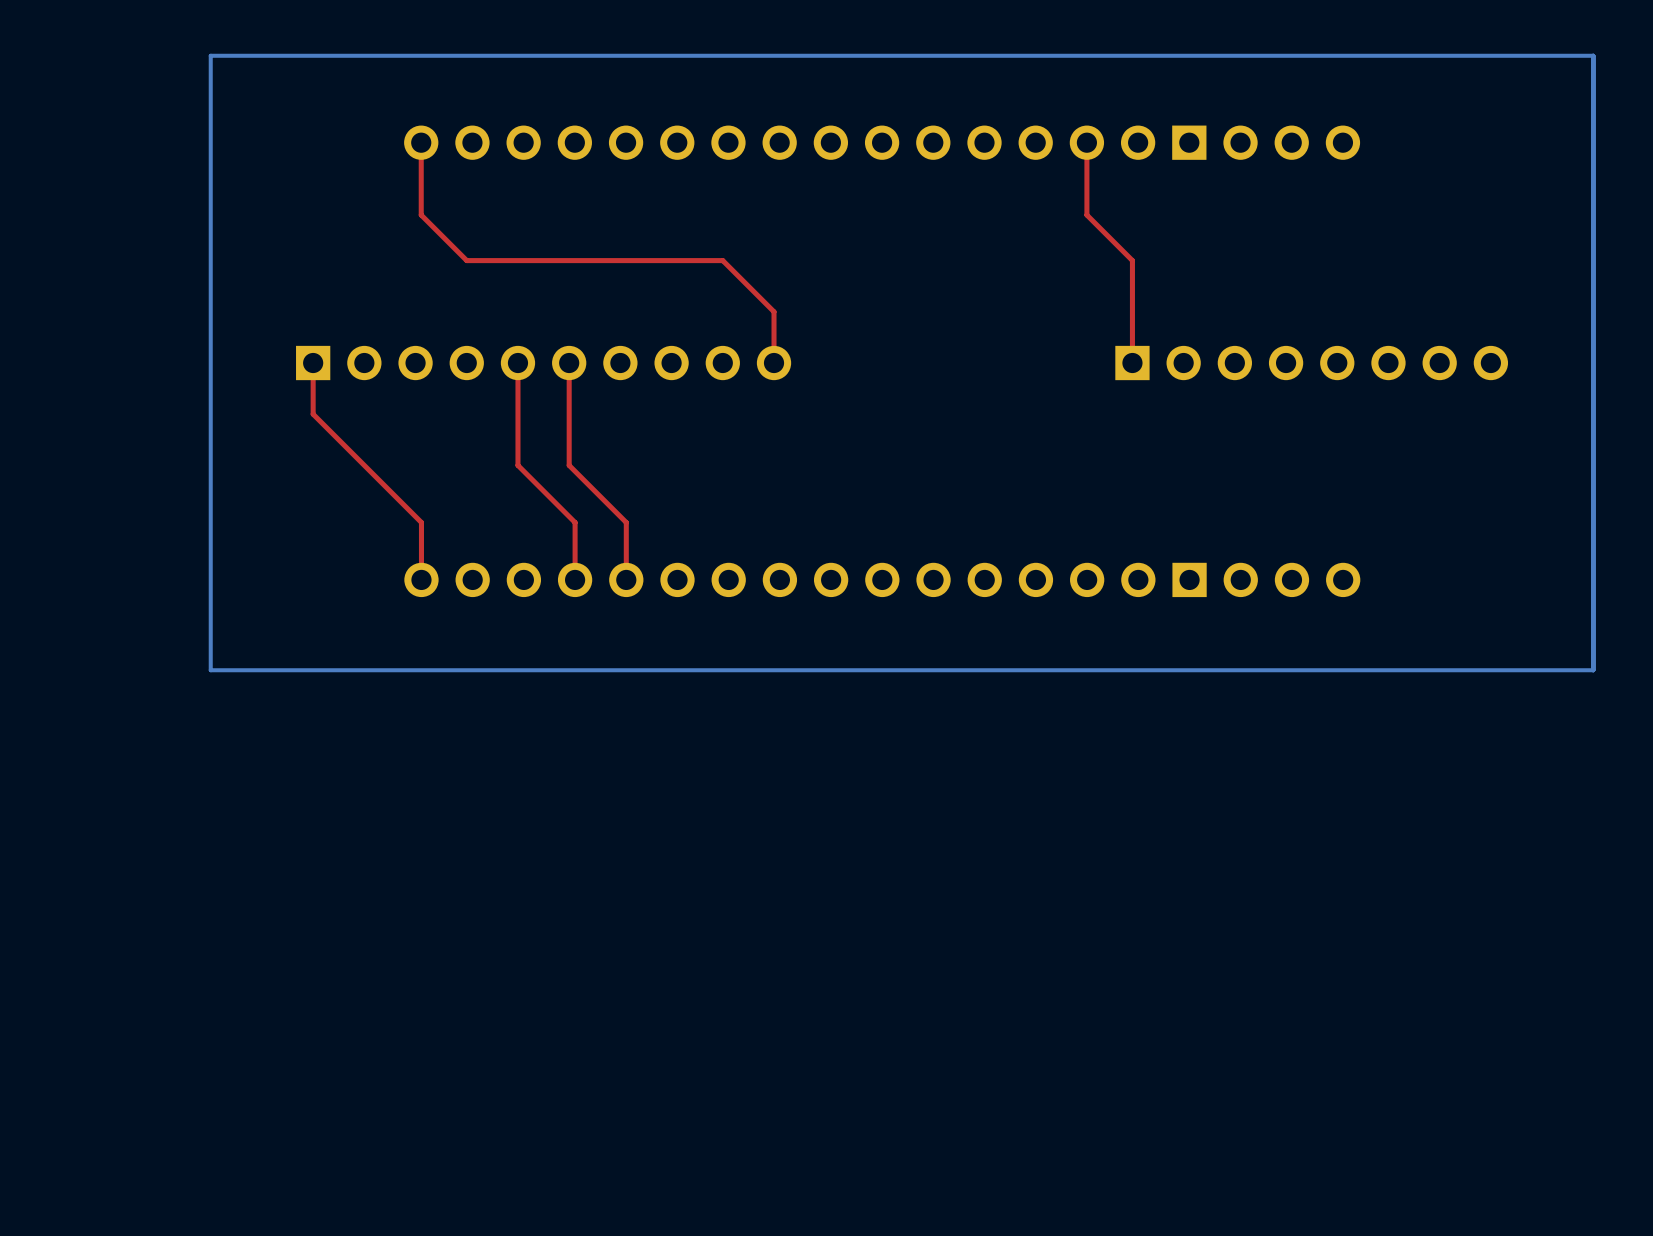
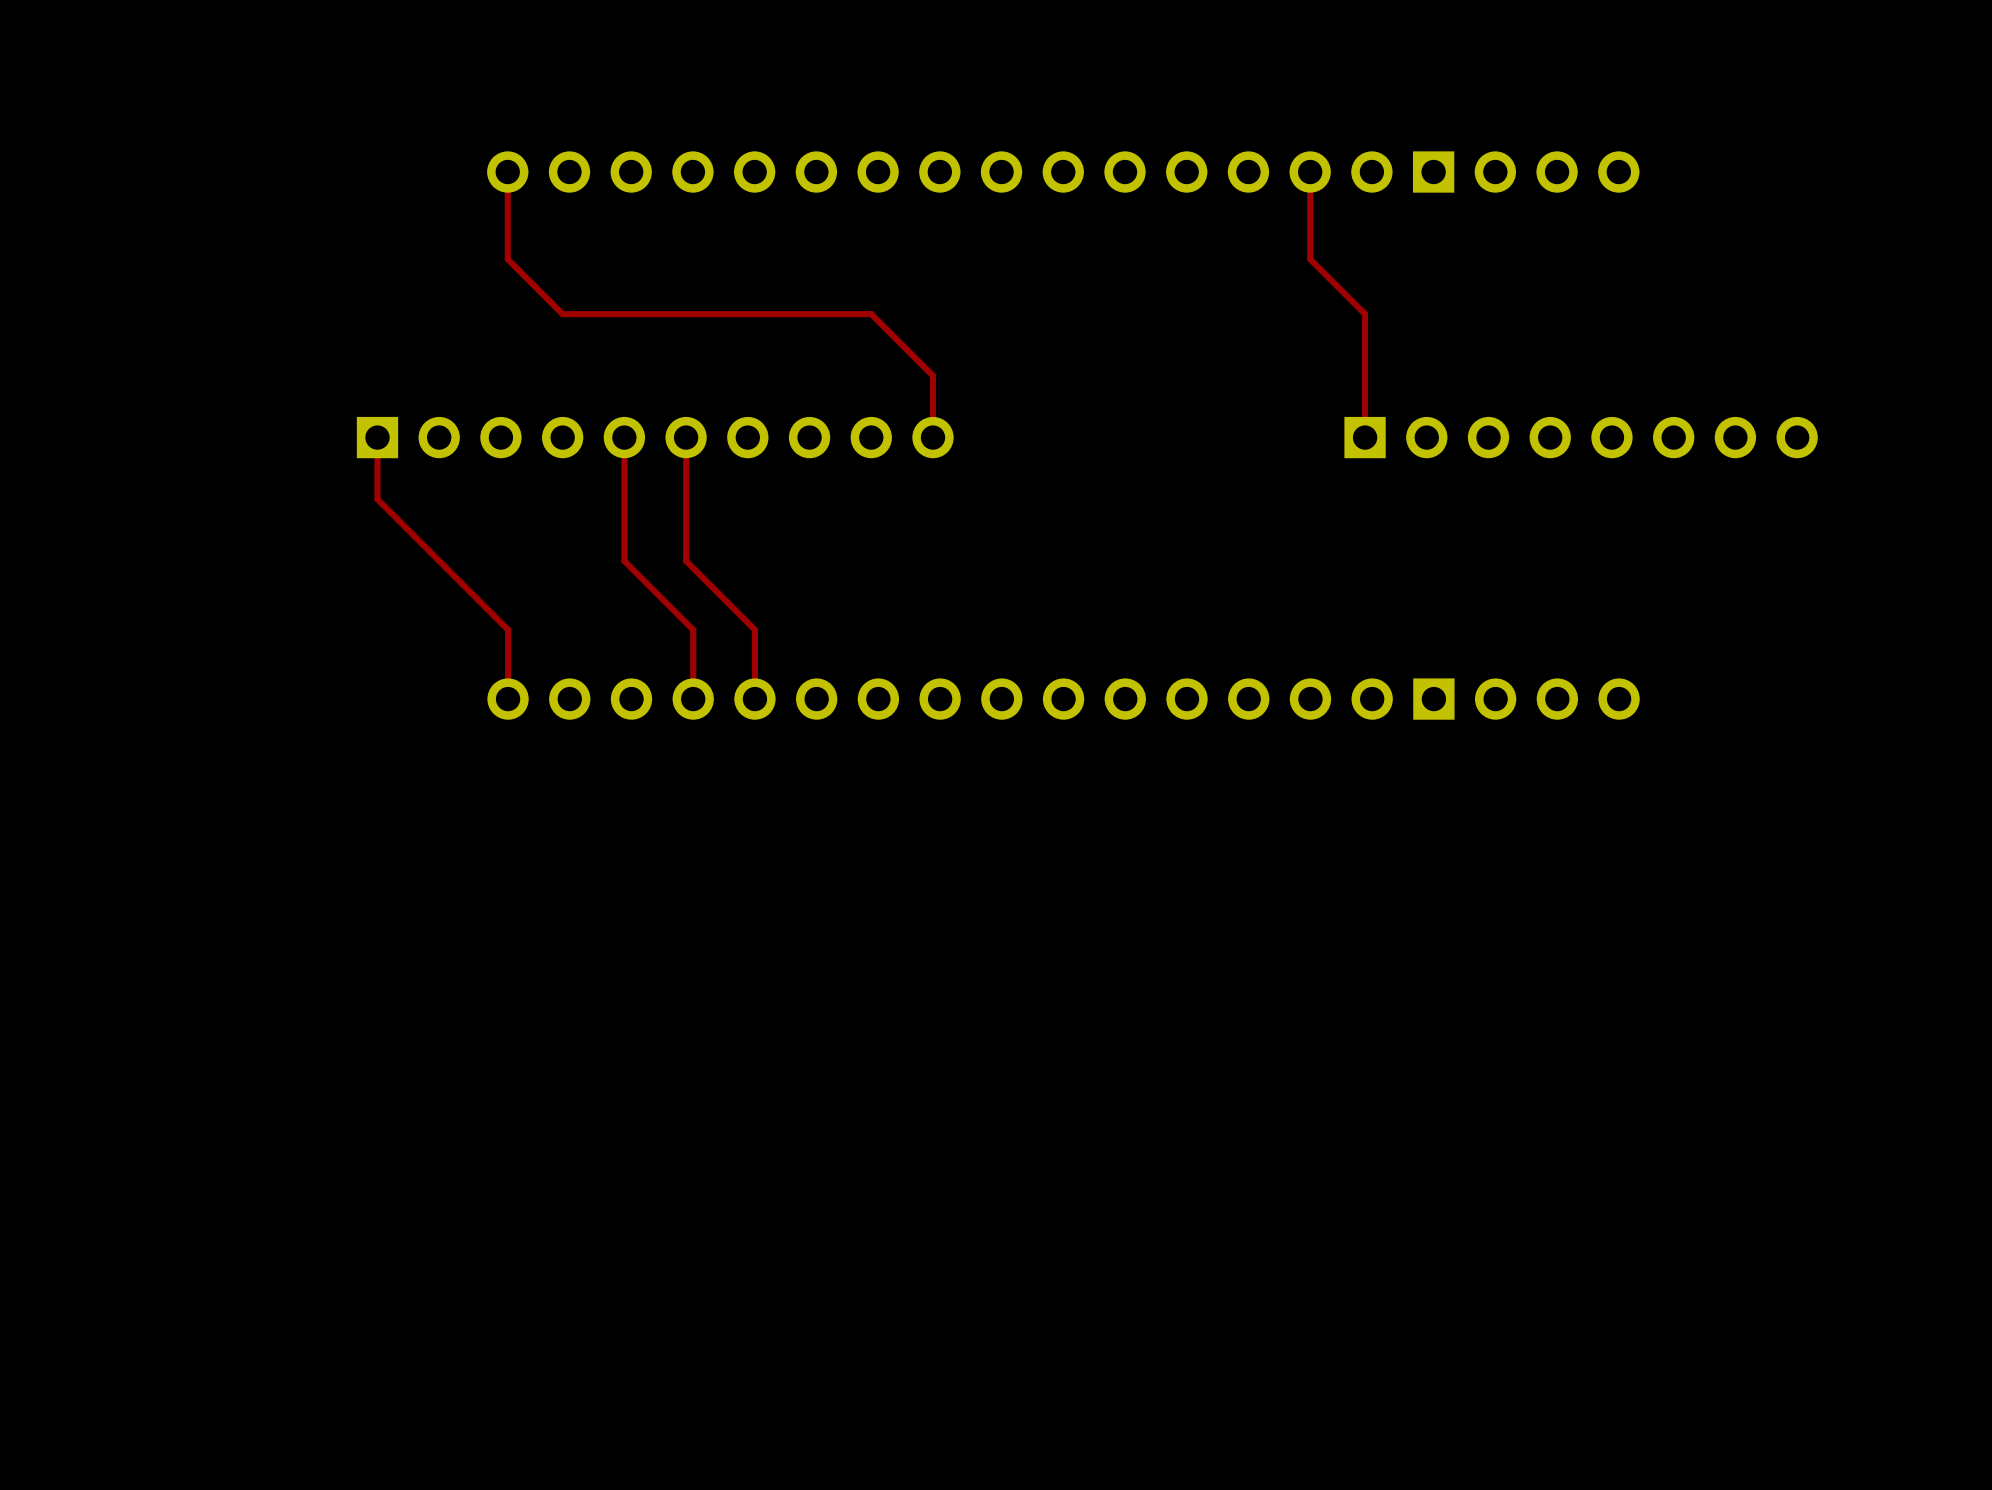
bottom track: (1593, 55) (210, 55) (210, 670) (1593, 670) (1593, 55) -> none

